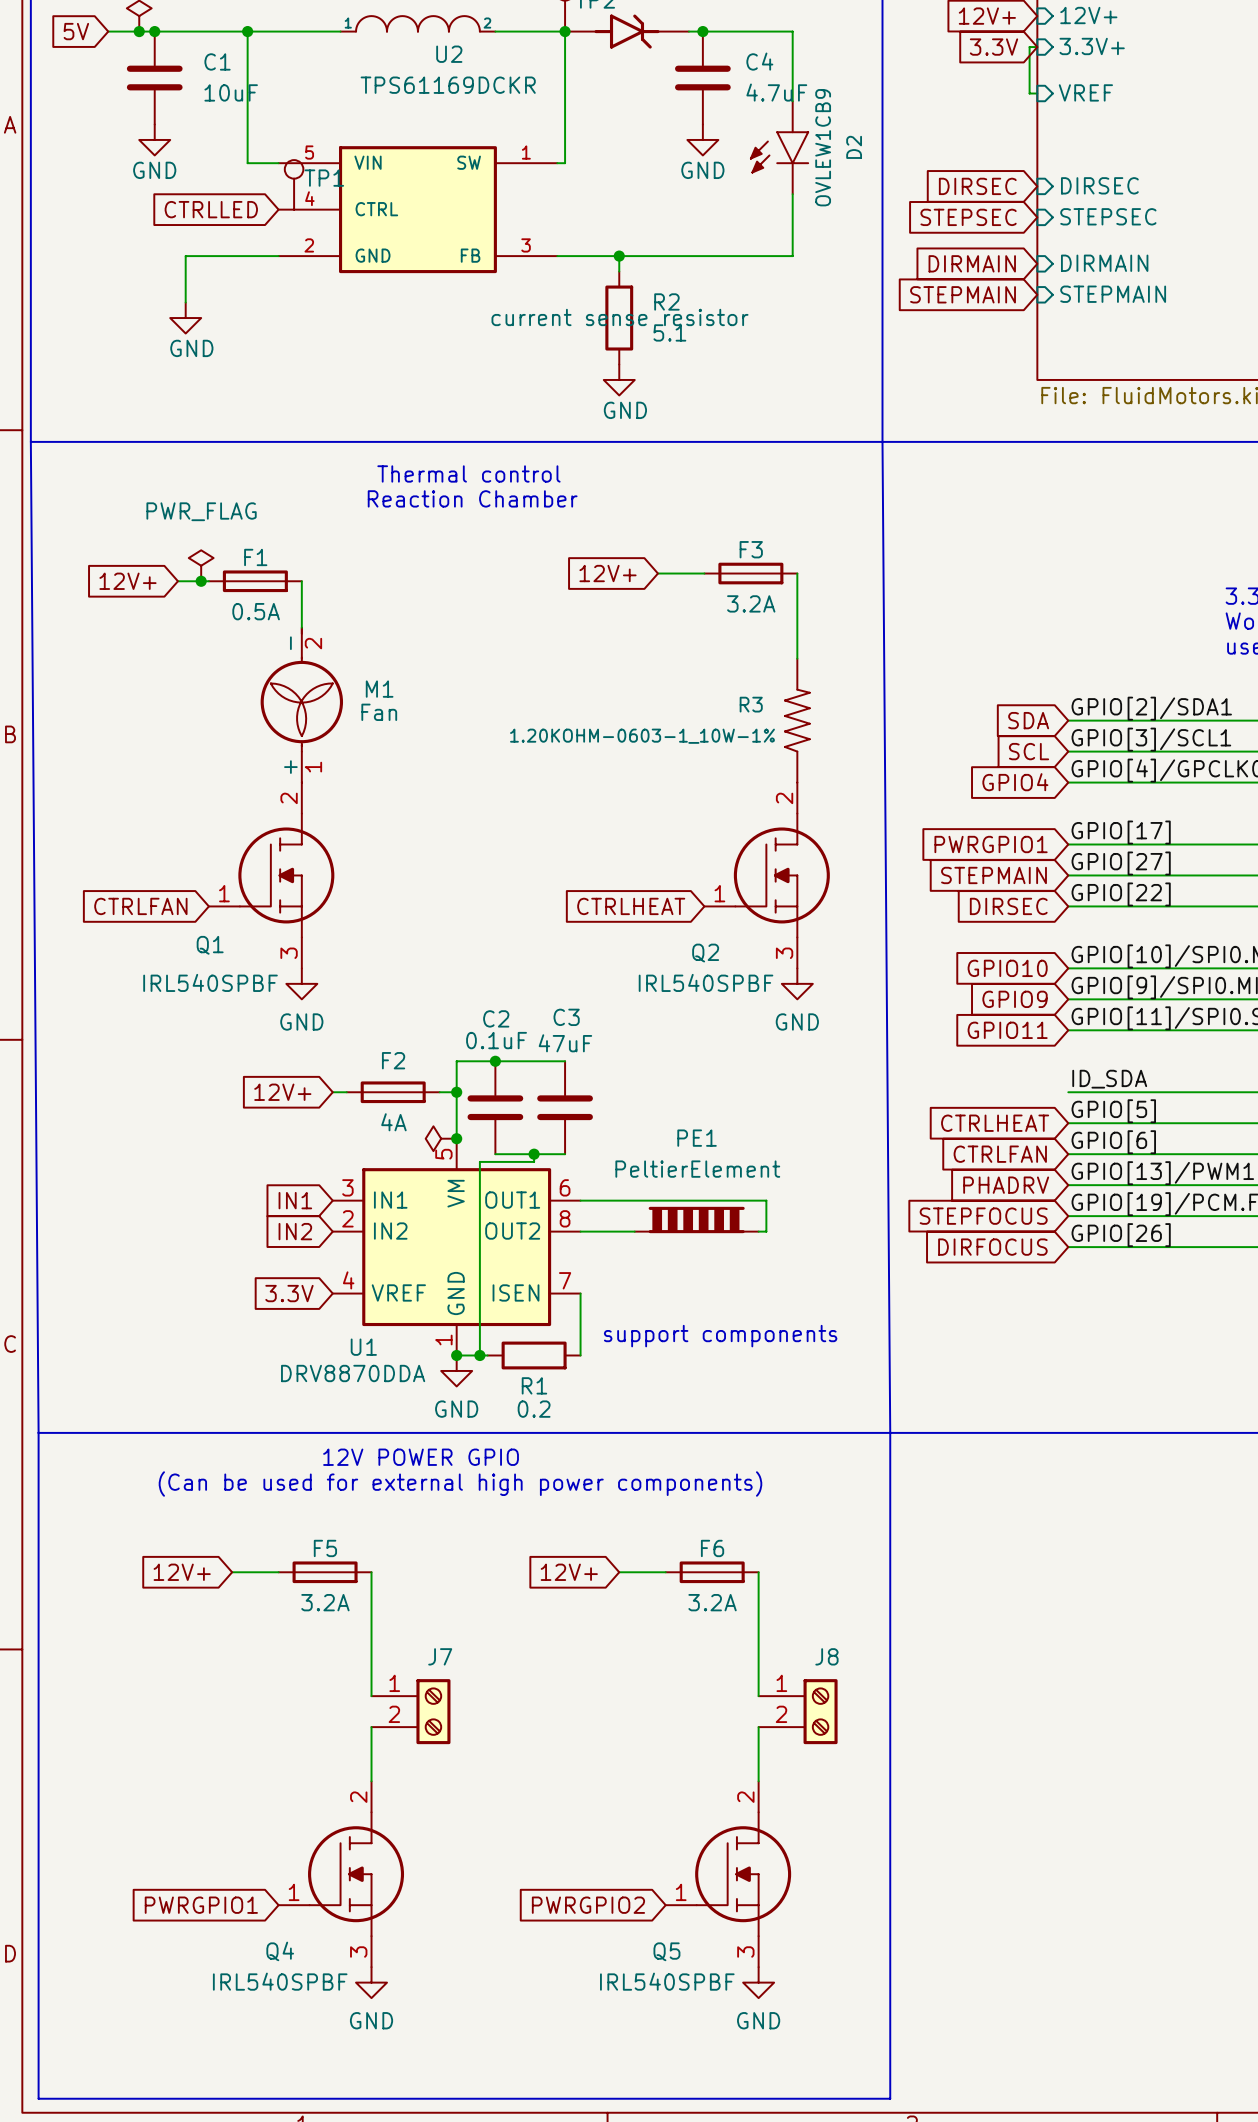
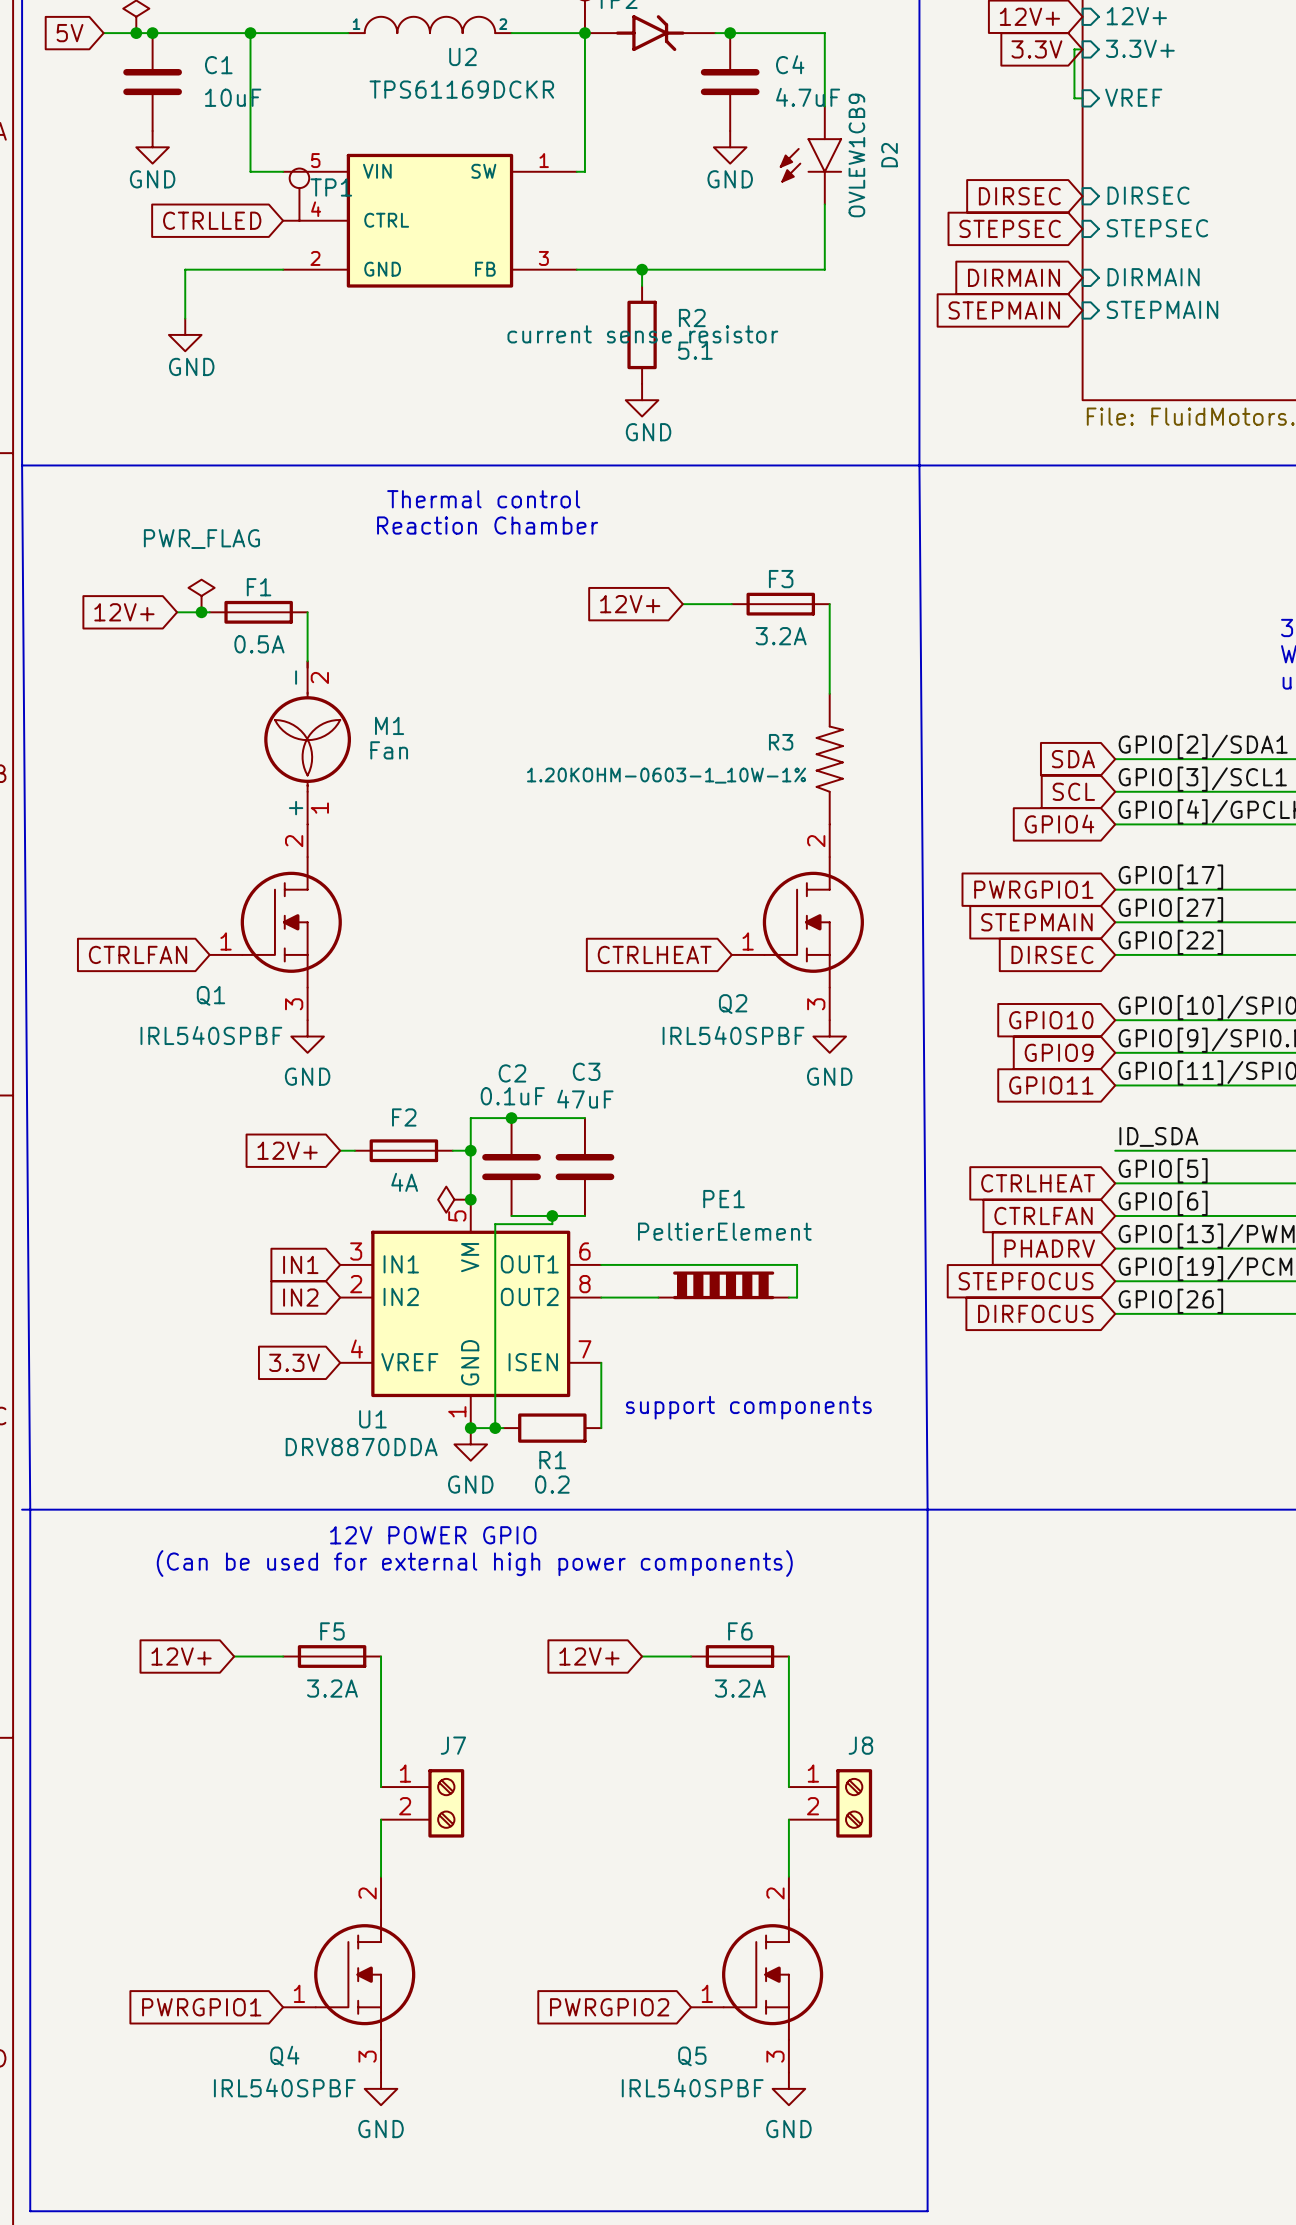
line: none -> (22, 1509) (30, 1509)

